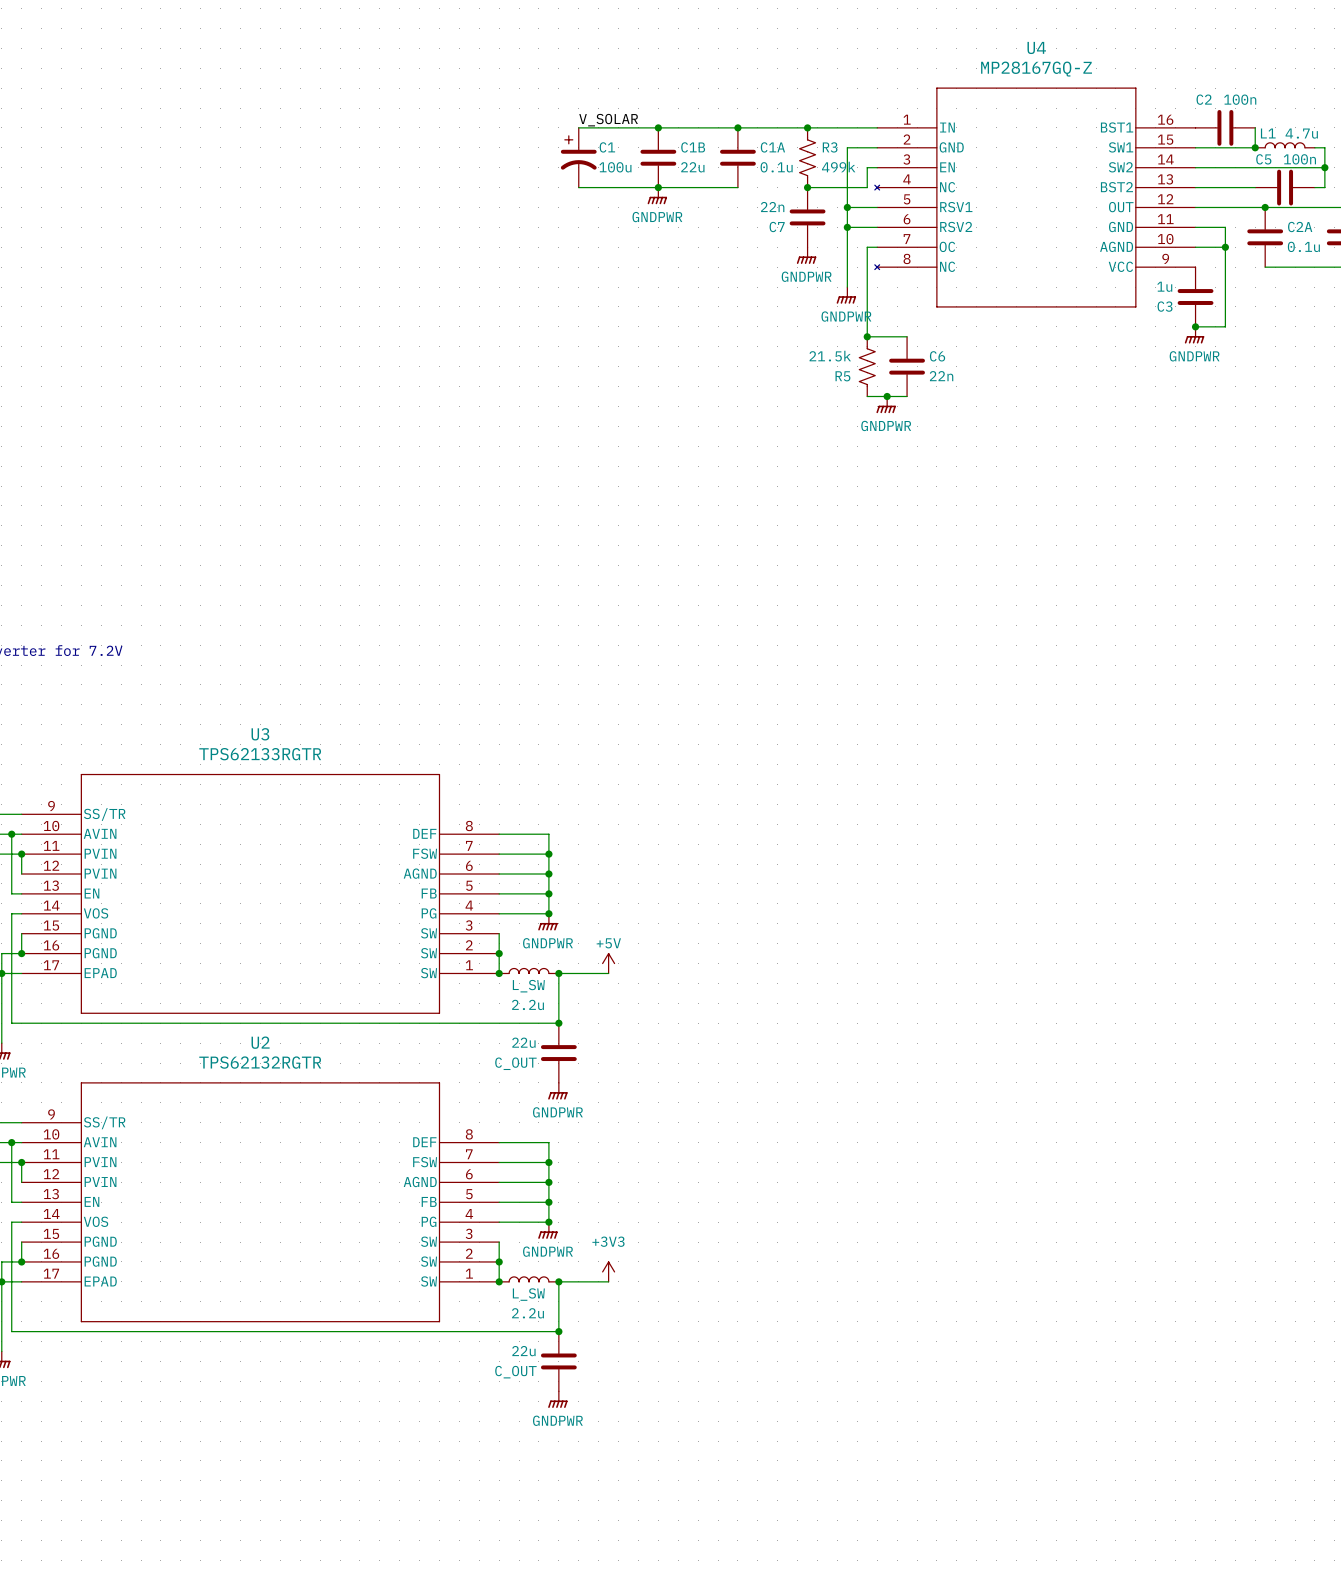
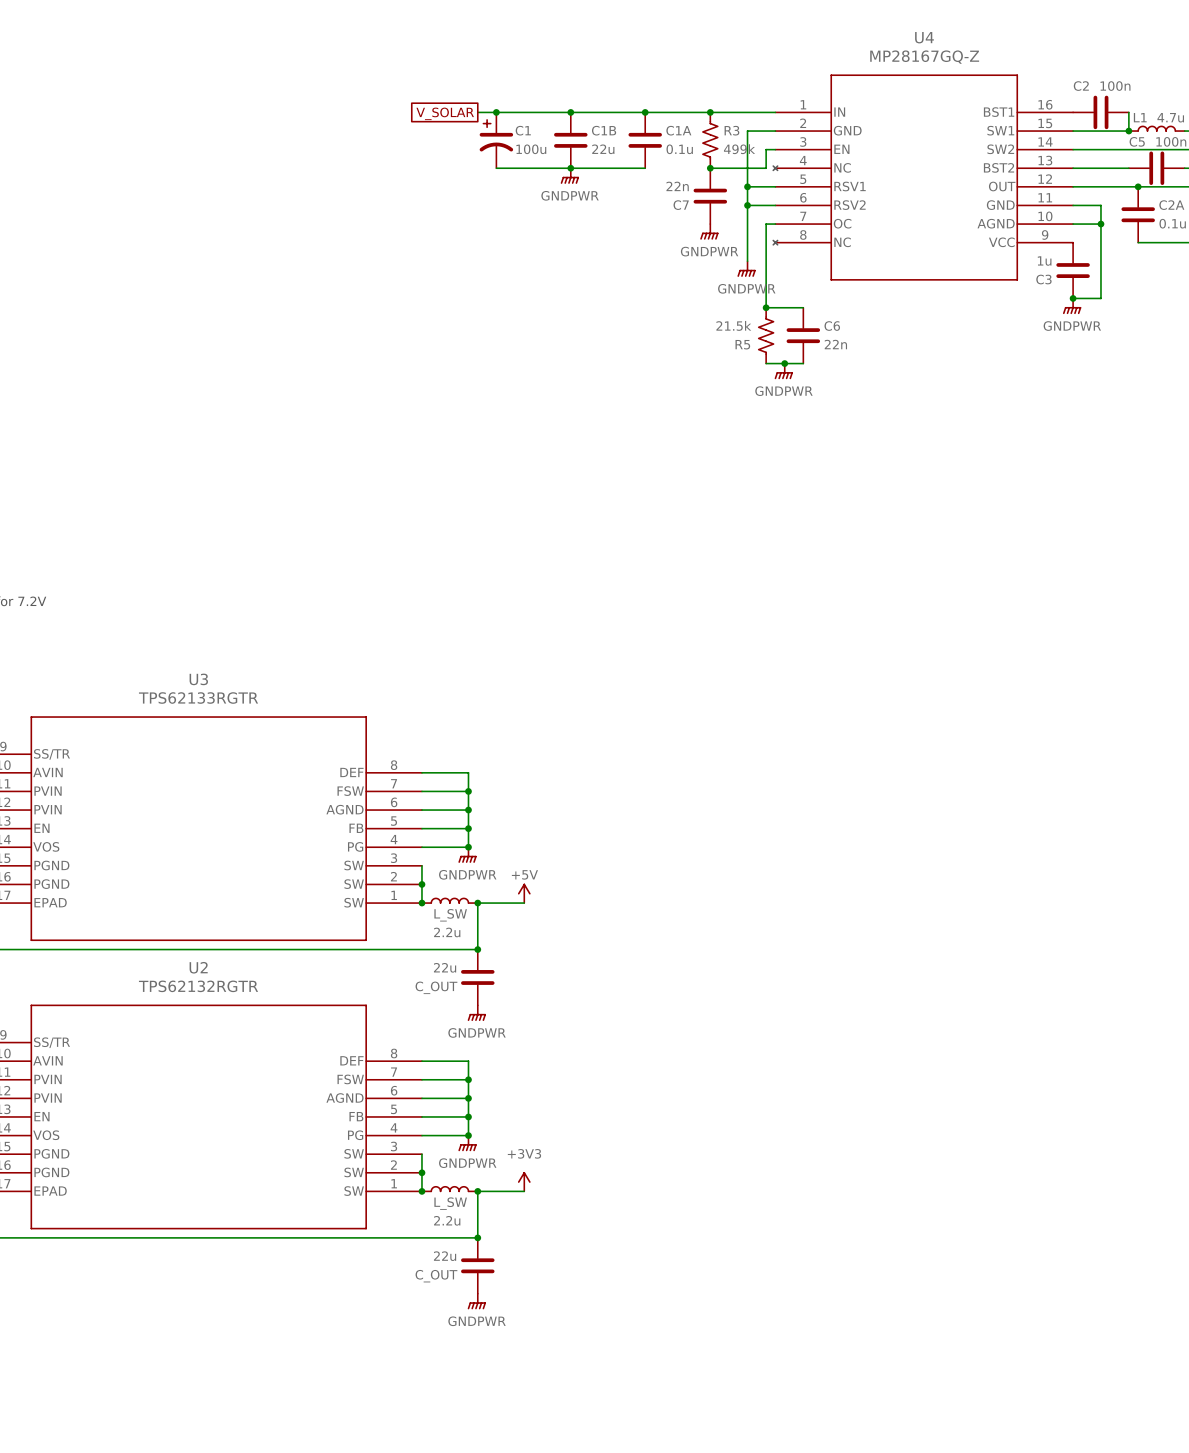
label: V_SOLAR (608, 120) -> none
wire: none -> (477, 112) (496, 112)
junction: none -> (496, 112)
global label: none -> V_SOLAR (445, 113)

